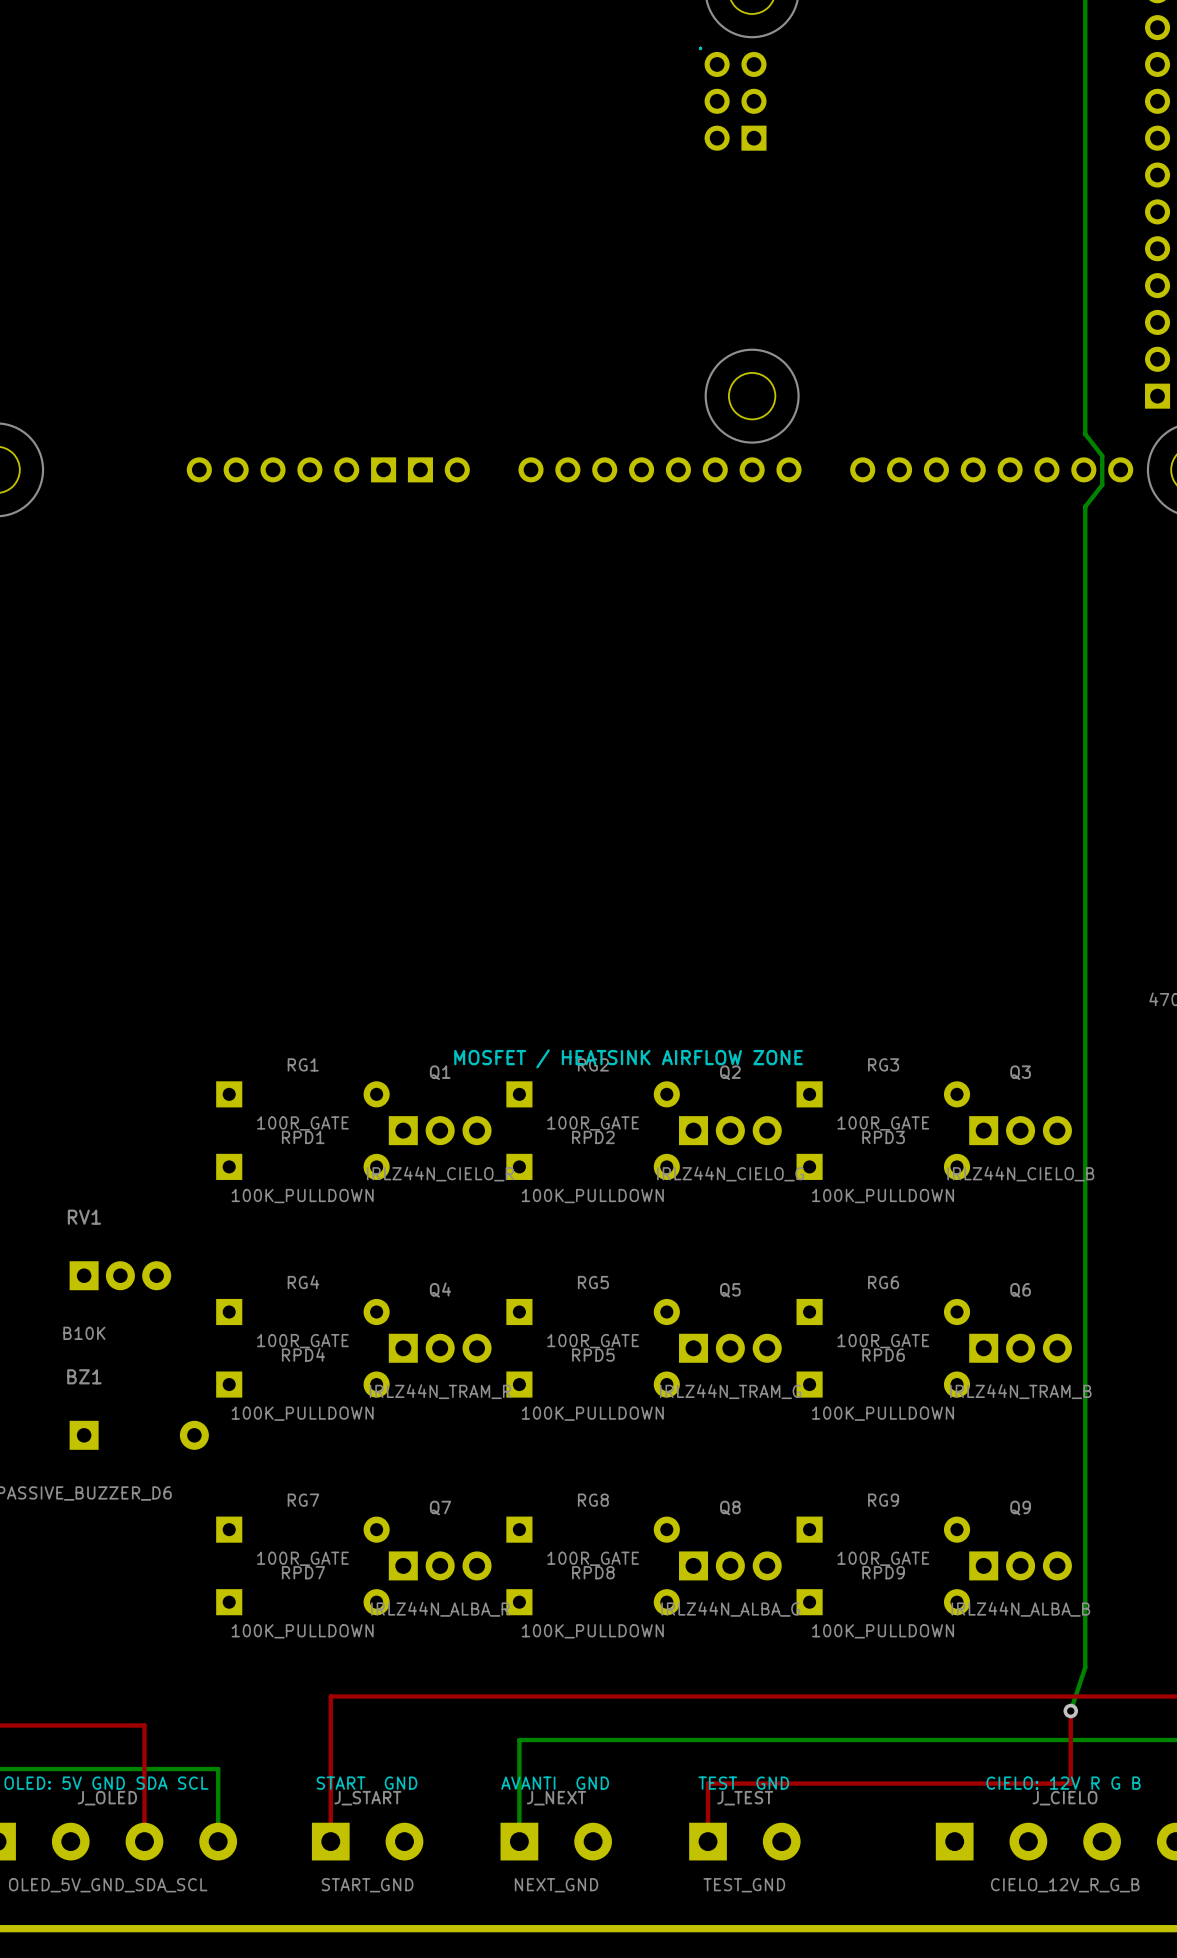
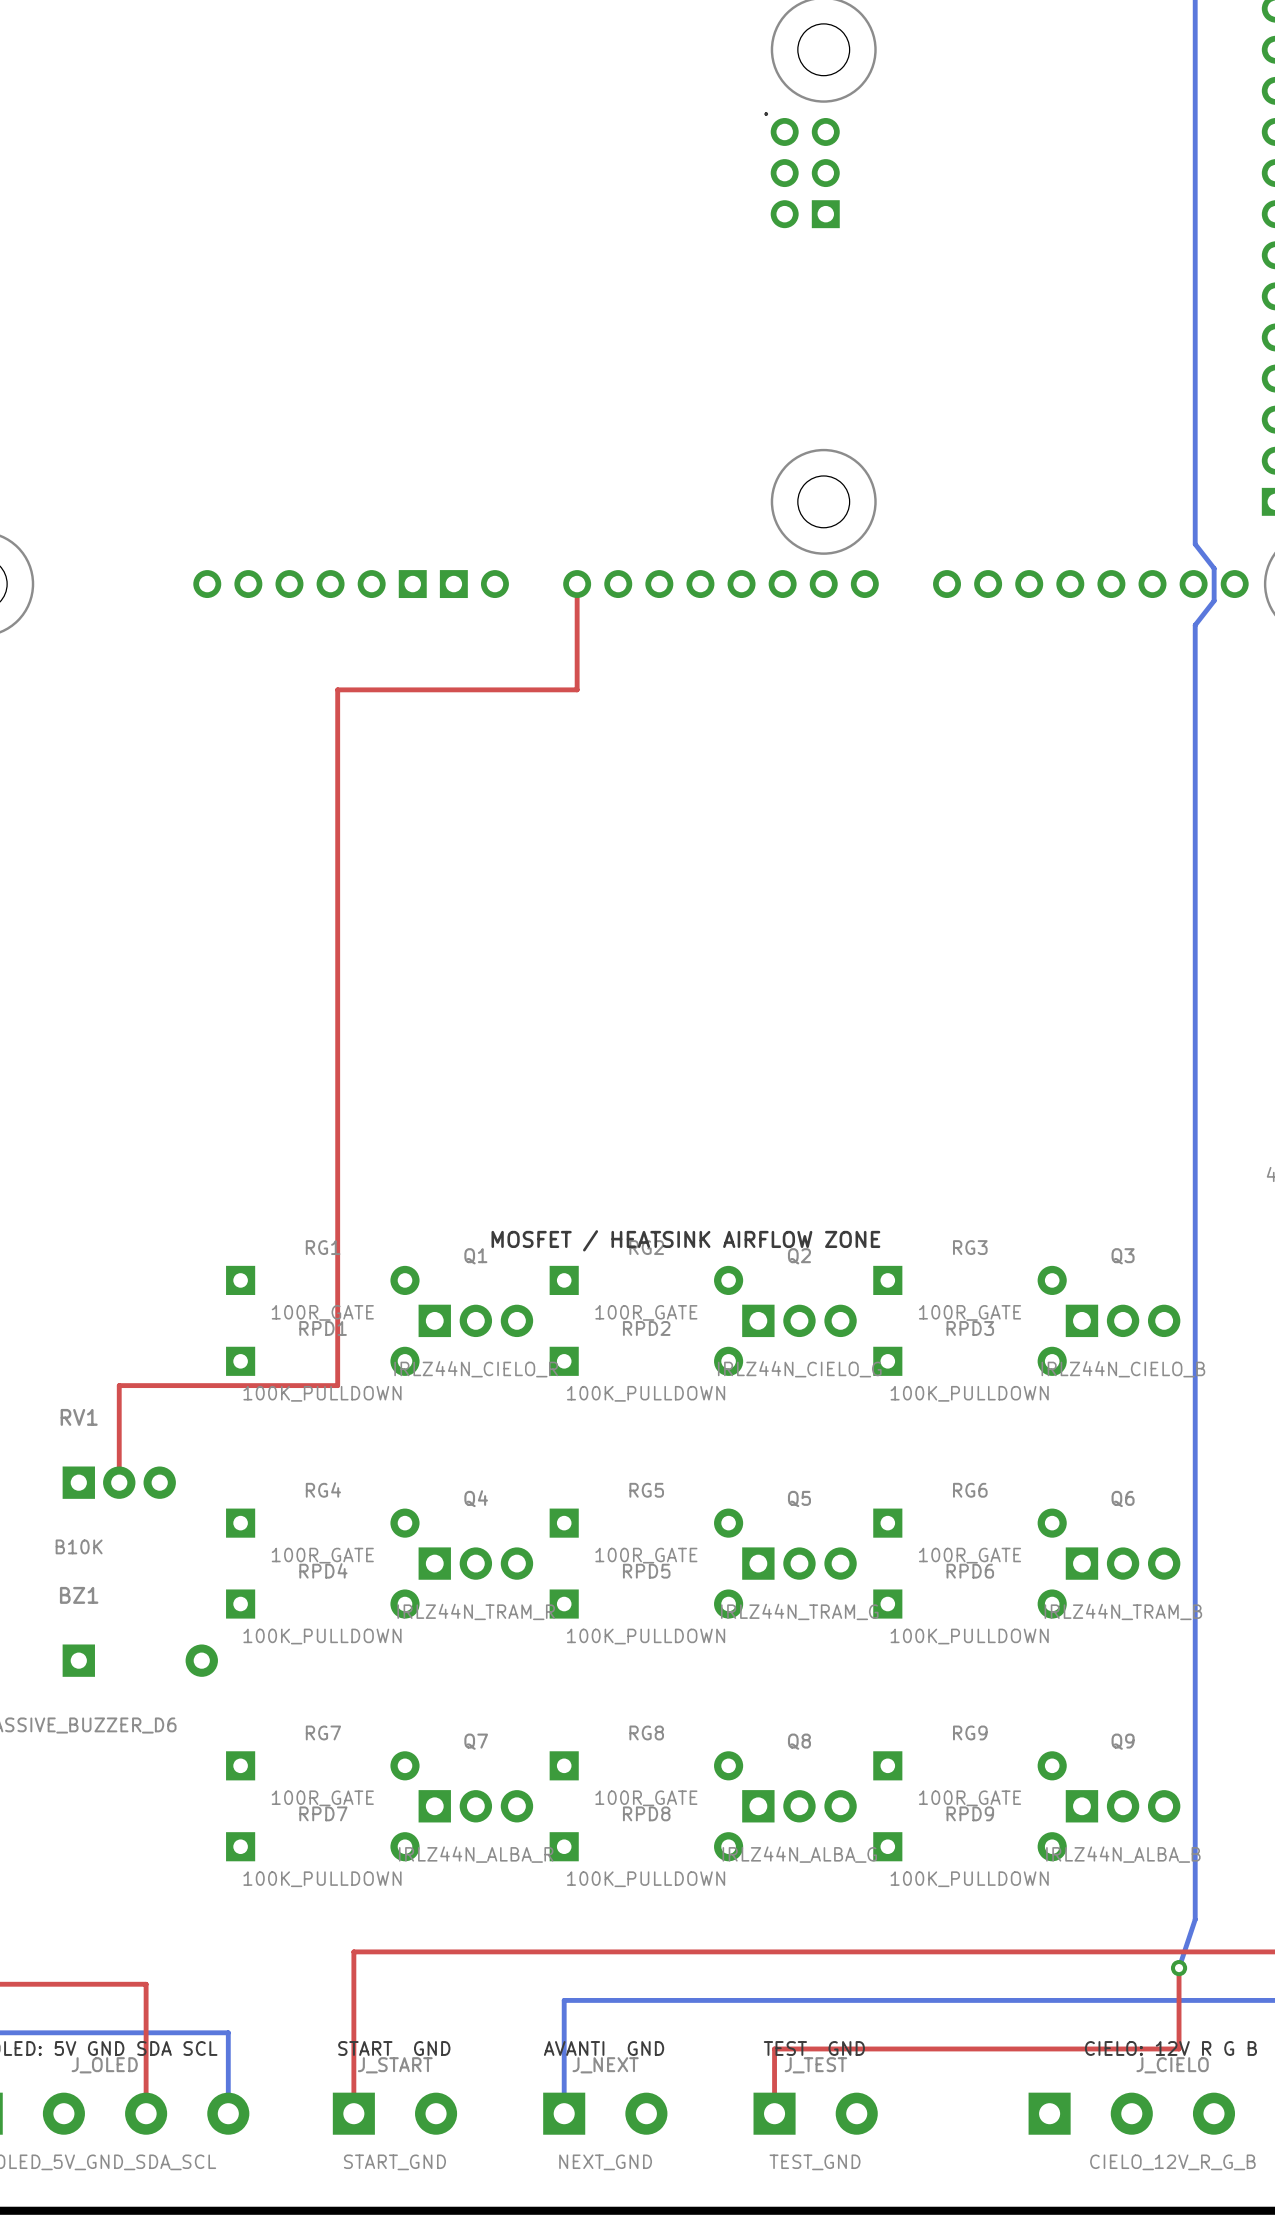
top track: none -> (577, 584) (577, 689) (337, 689) (337, 1385) (119, 1385) (119, 1482)

